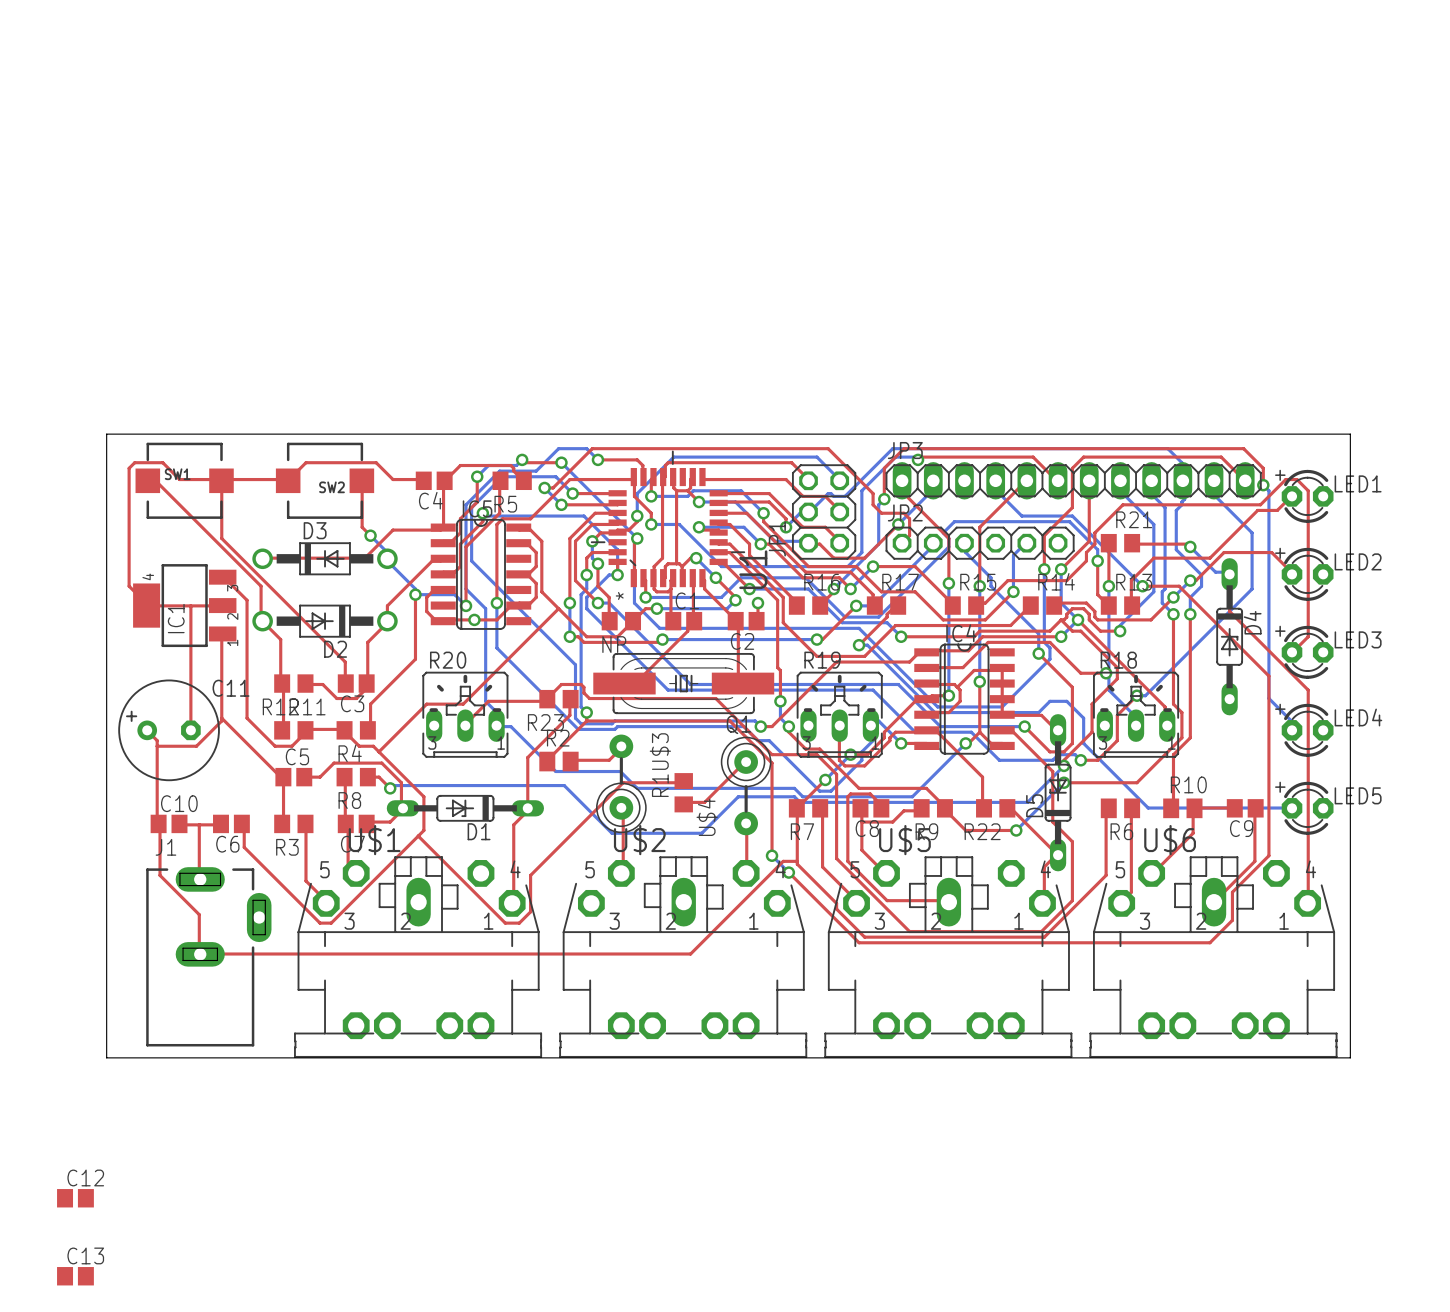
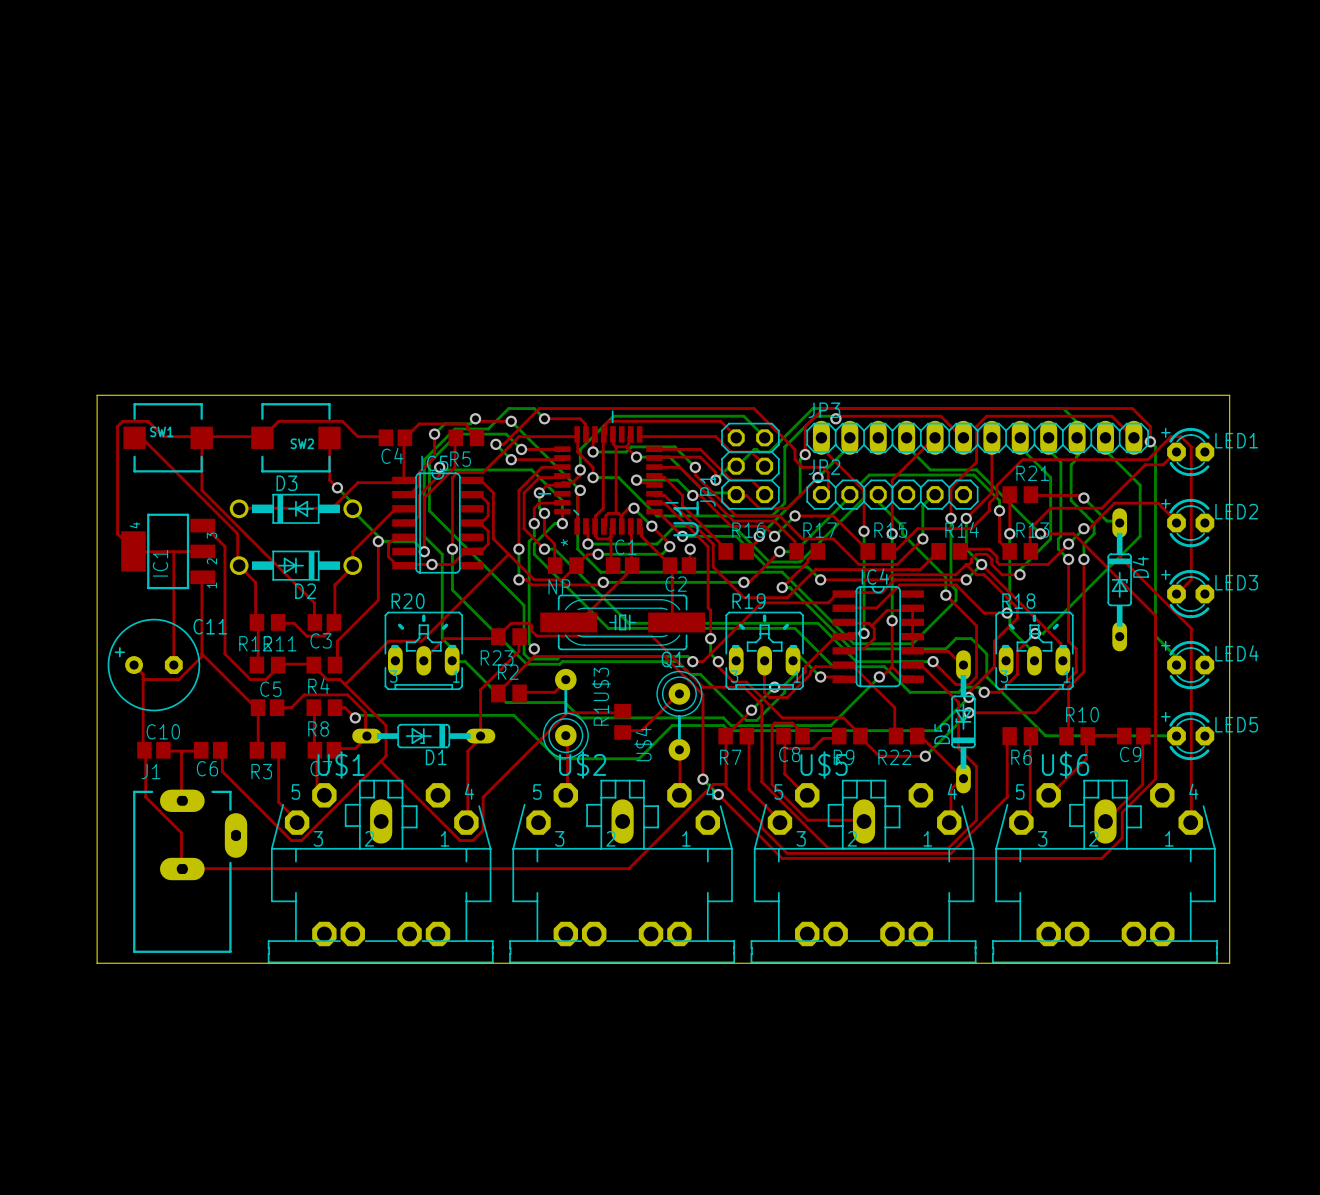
C12: (75, 1198) -> none
C13: (75, 1276) -> none

